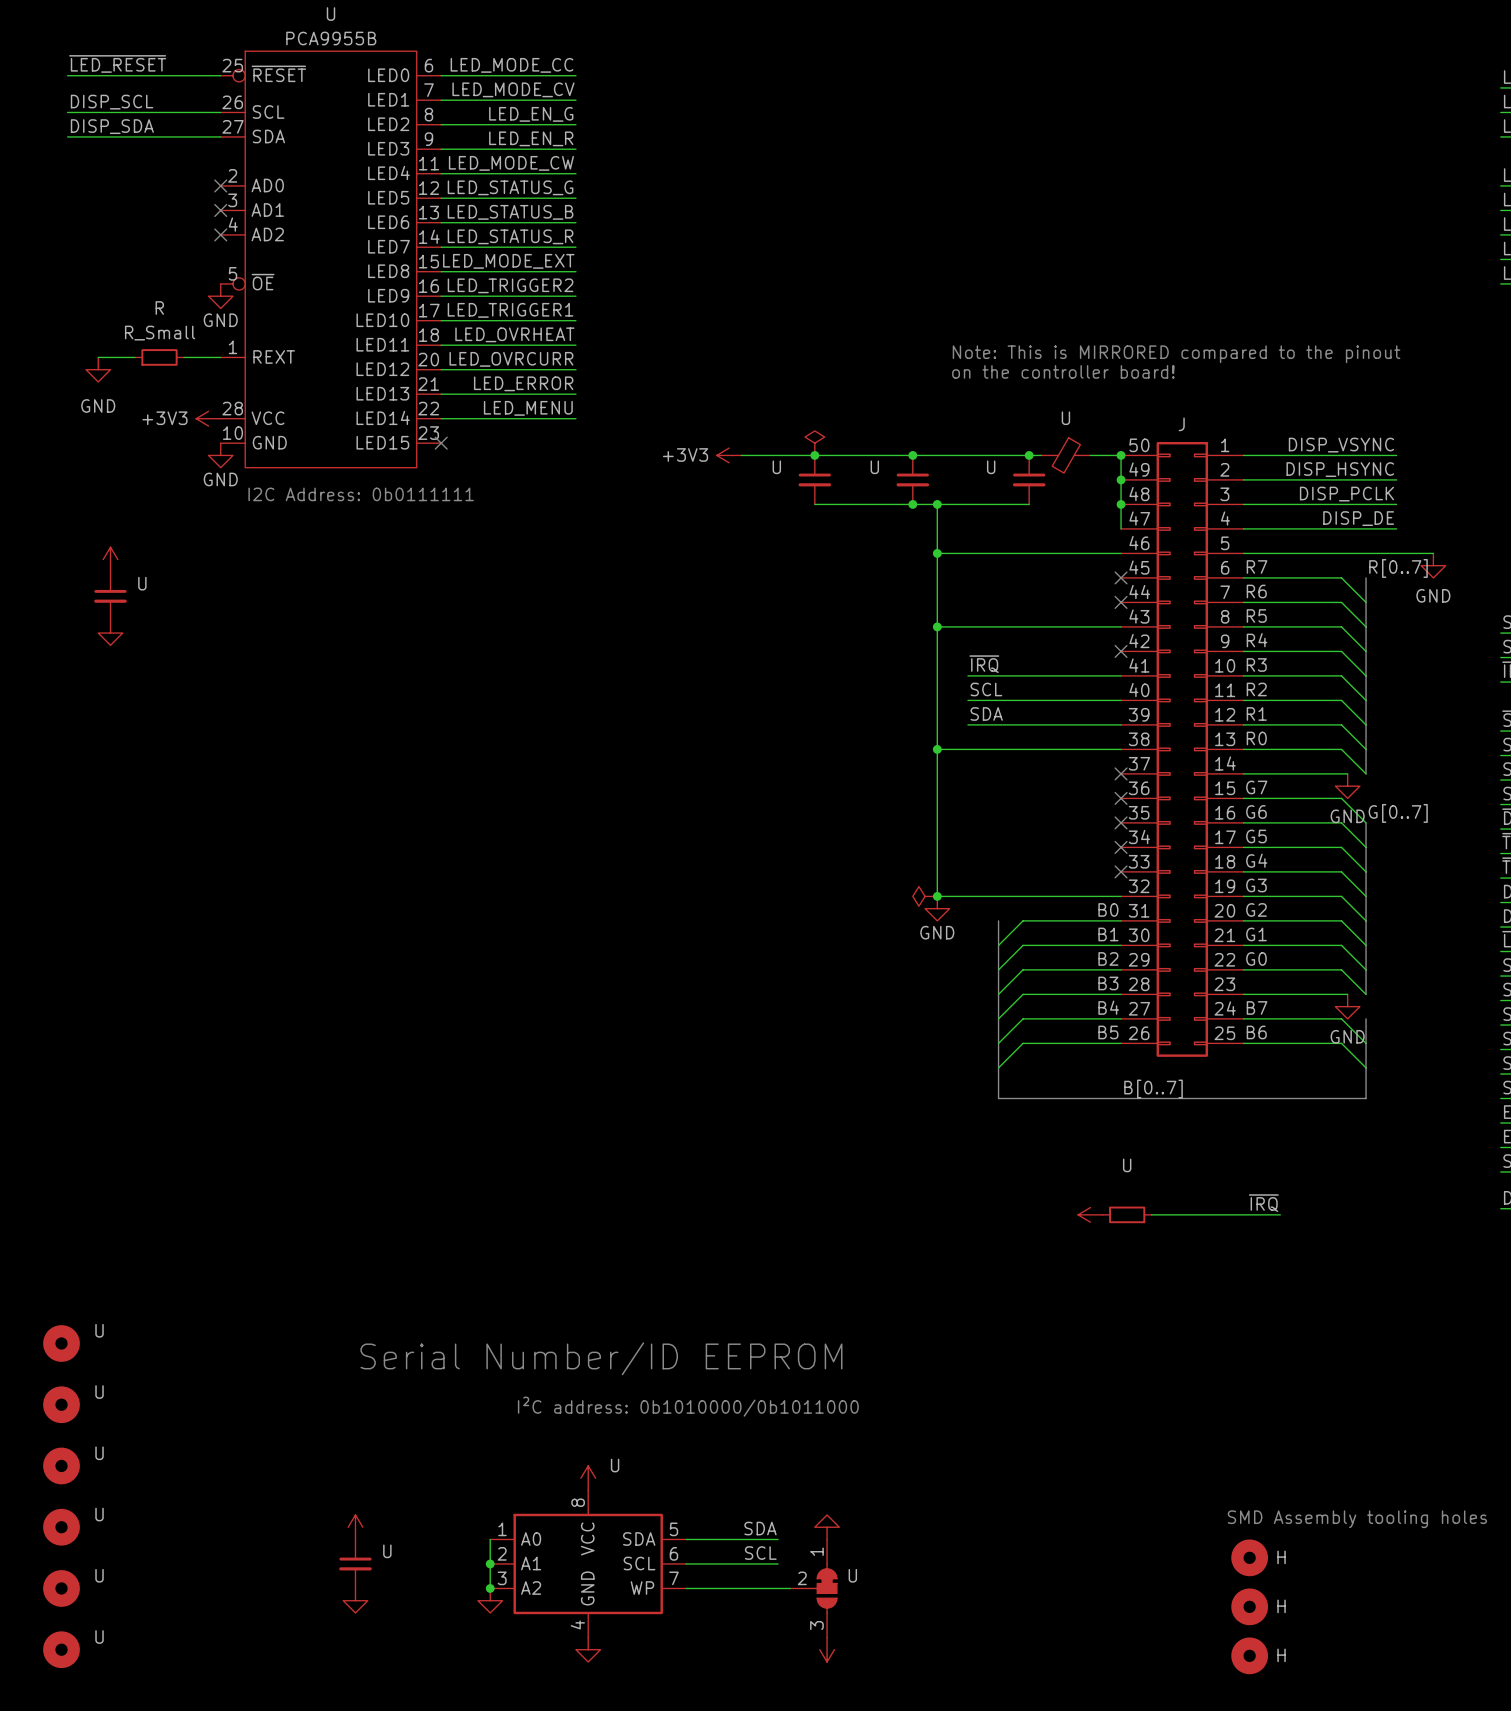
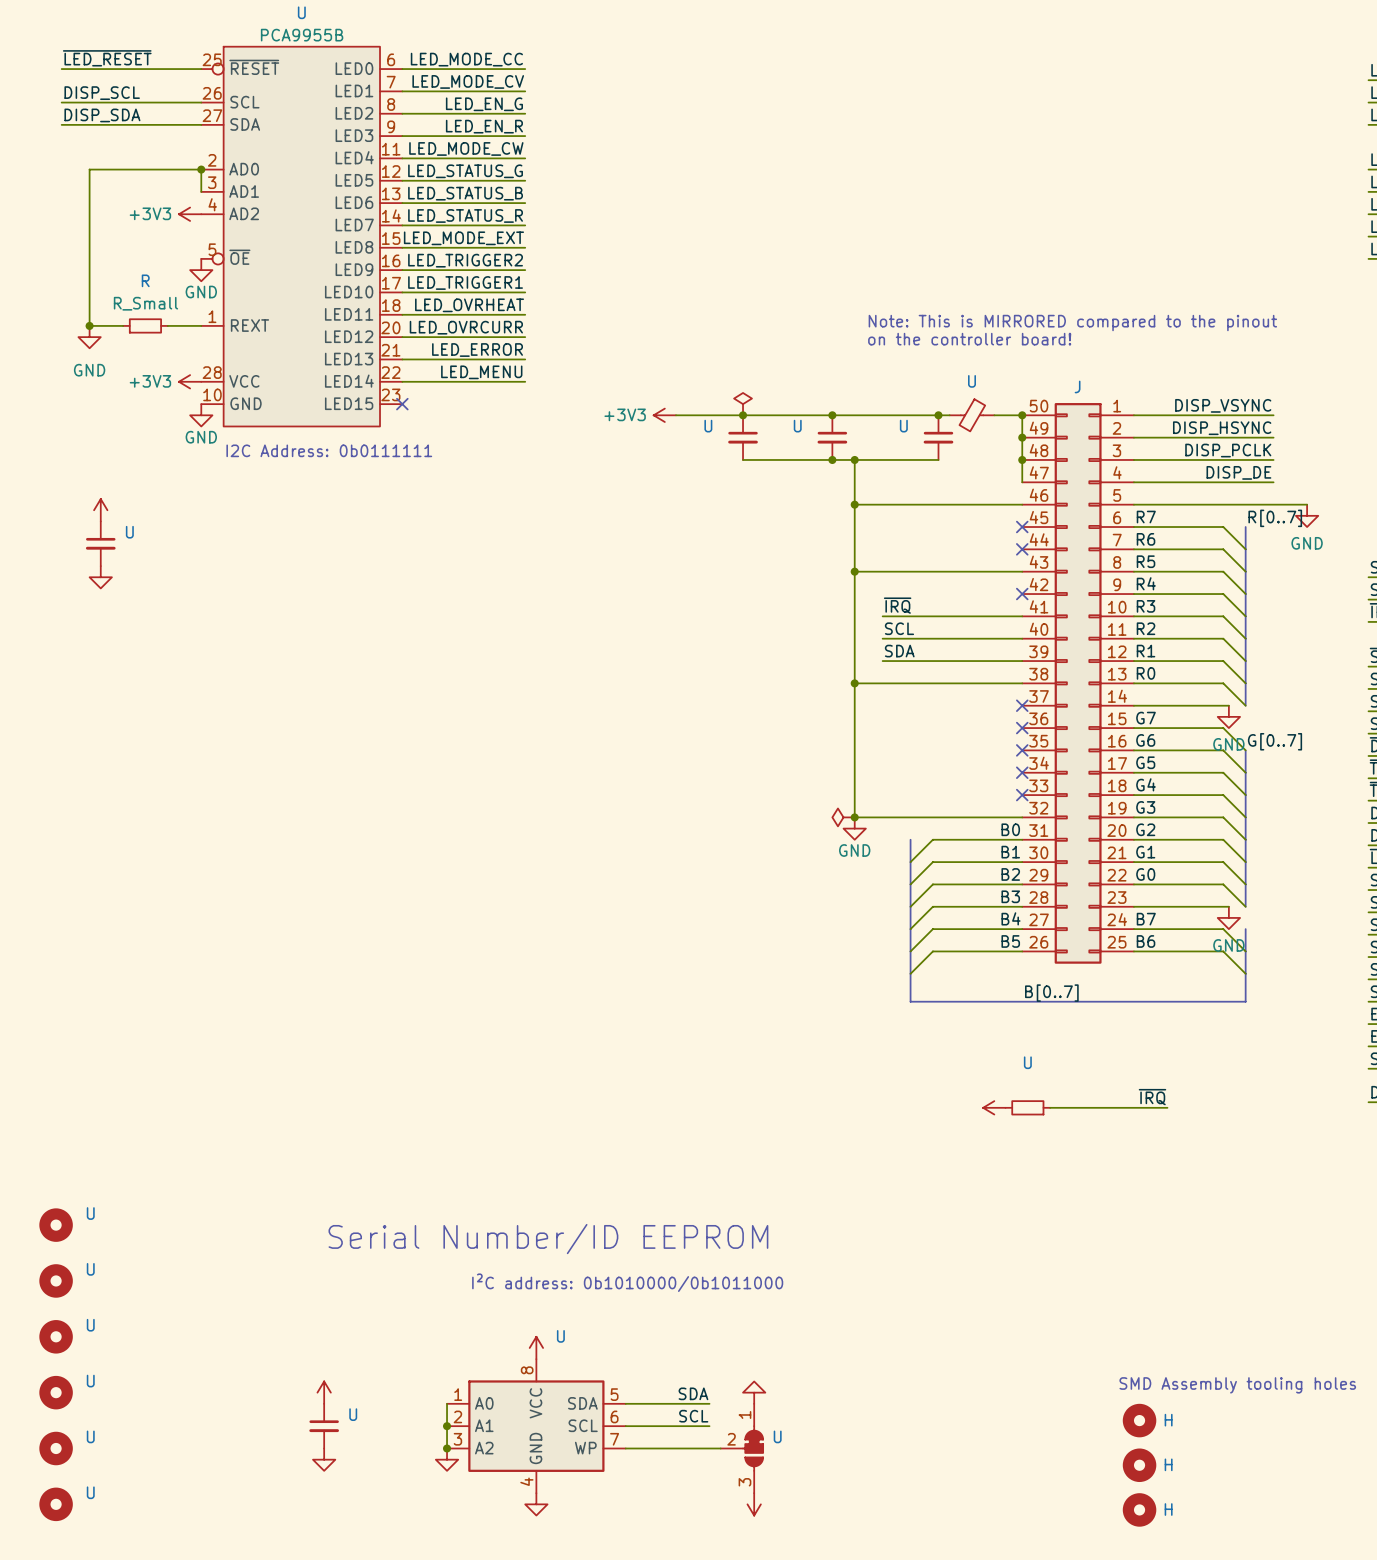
no-connect mark: (220, 185) -> none
junction: none -> (201, 169)
wire: none -> (201, 191) (201, 169) (89, 169) (89, 325)
no-connect mark: (220, 210) -> none
power symbol: none -> +3V3 (190, 214)
no-connect mark: (220, 234) -> none
junction: none -> (89, 325)

